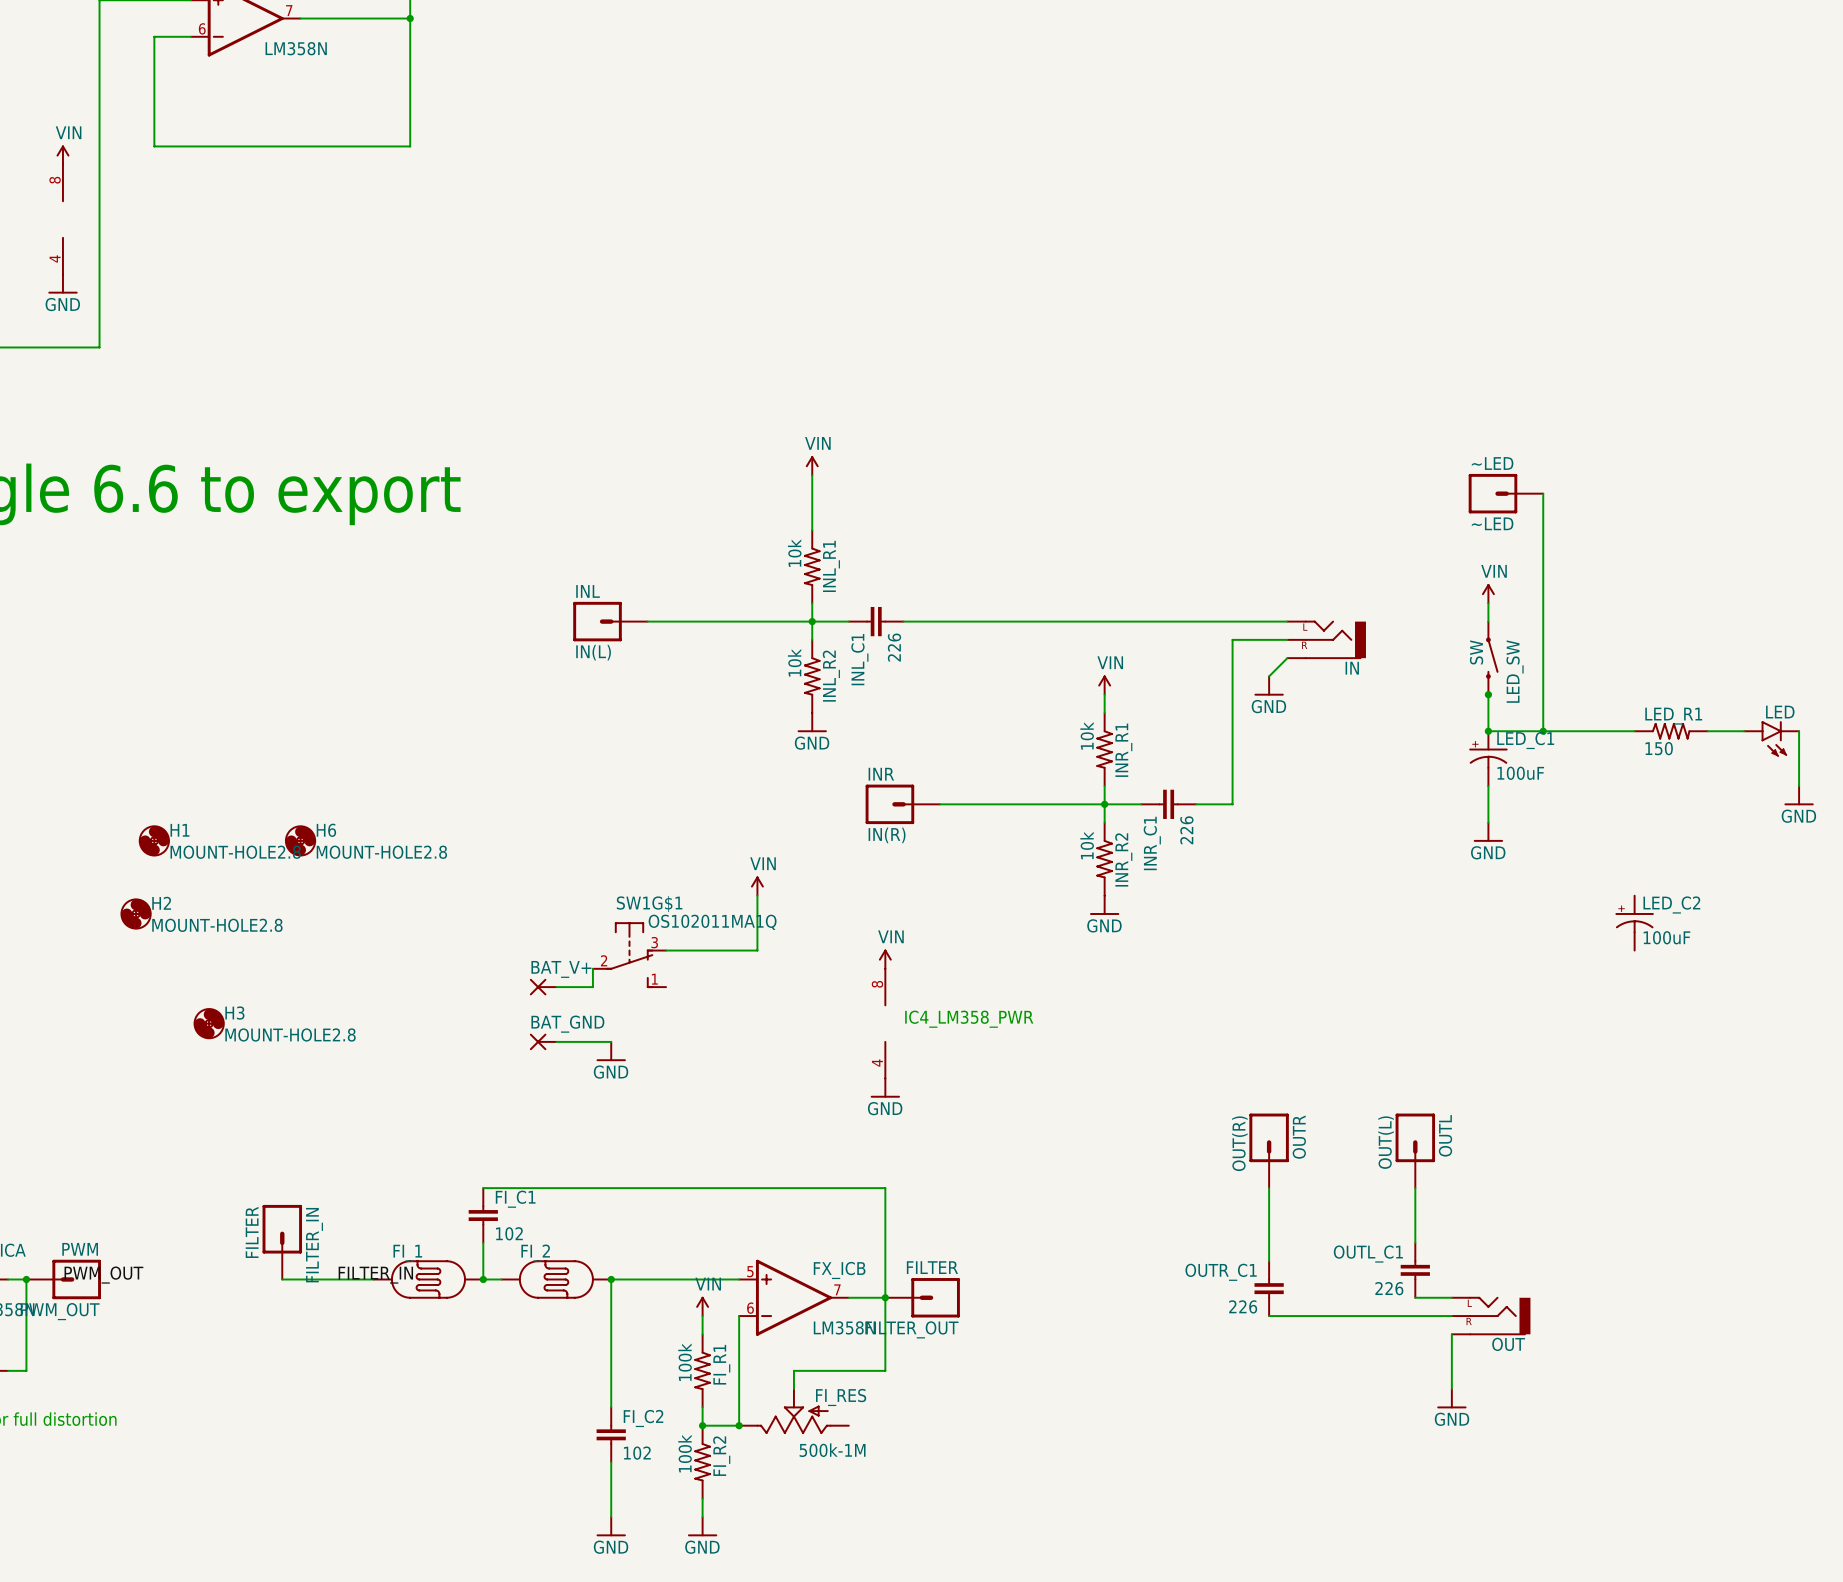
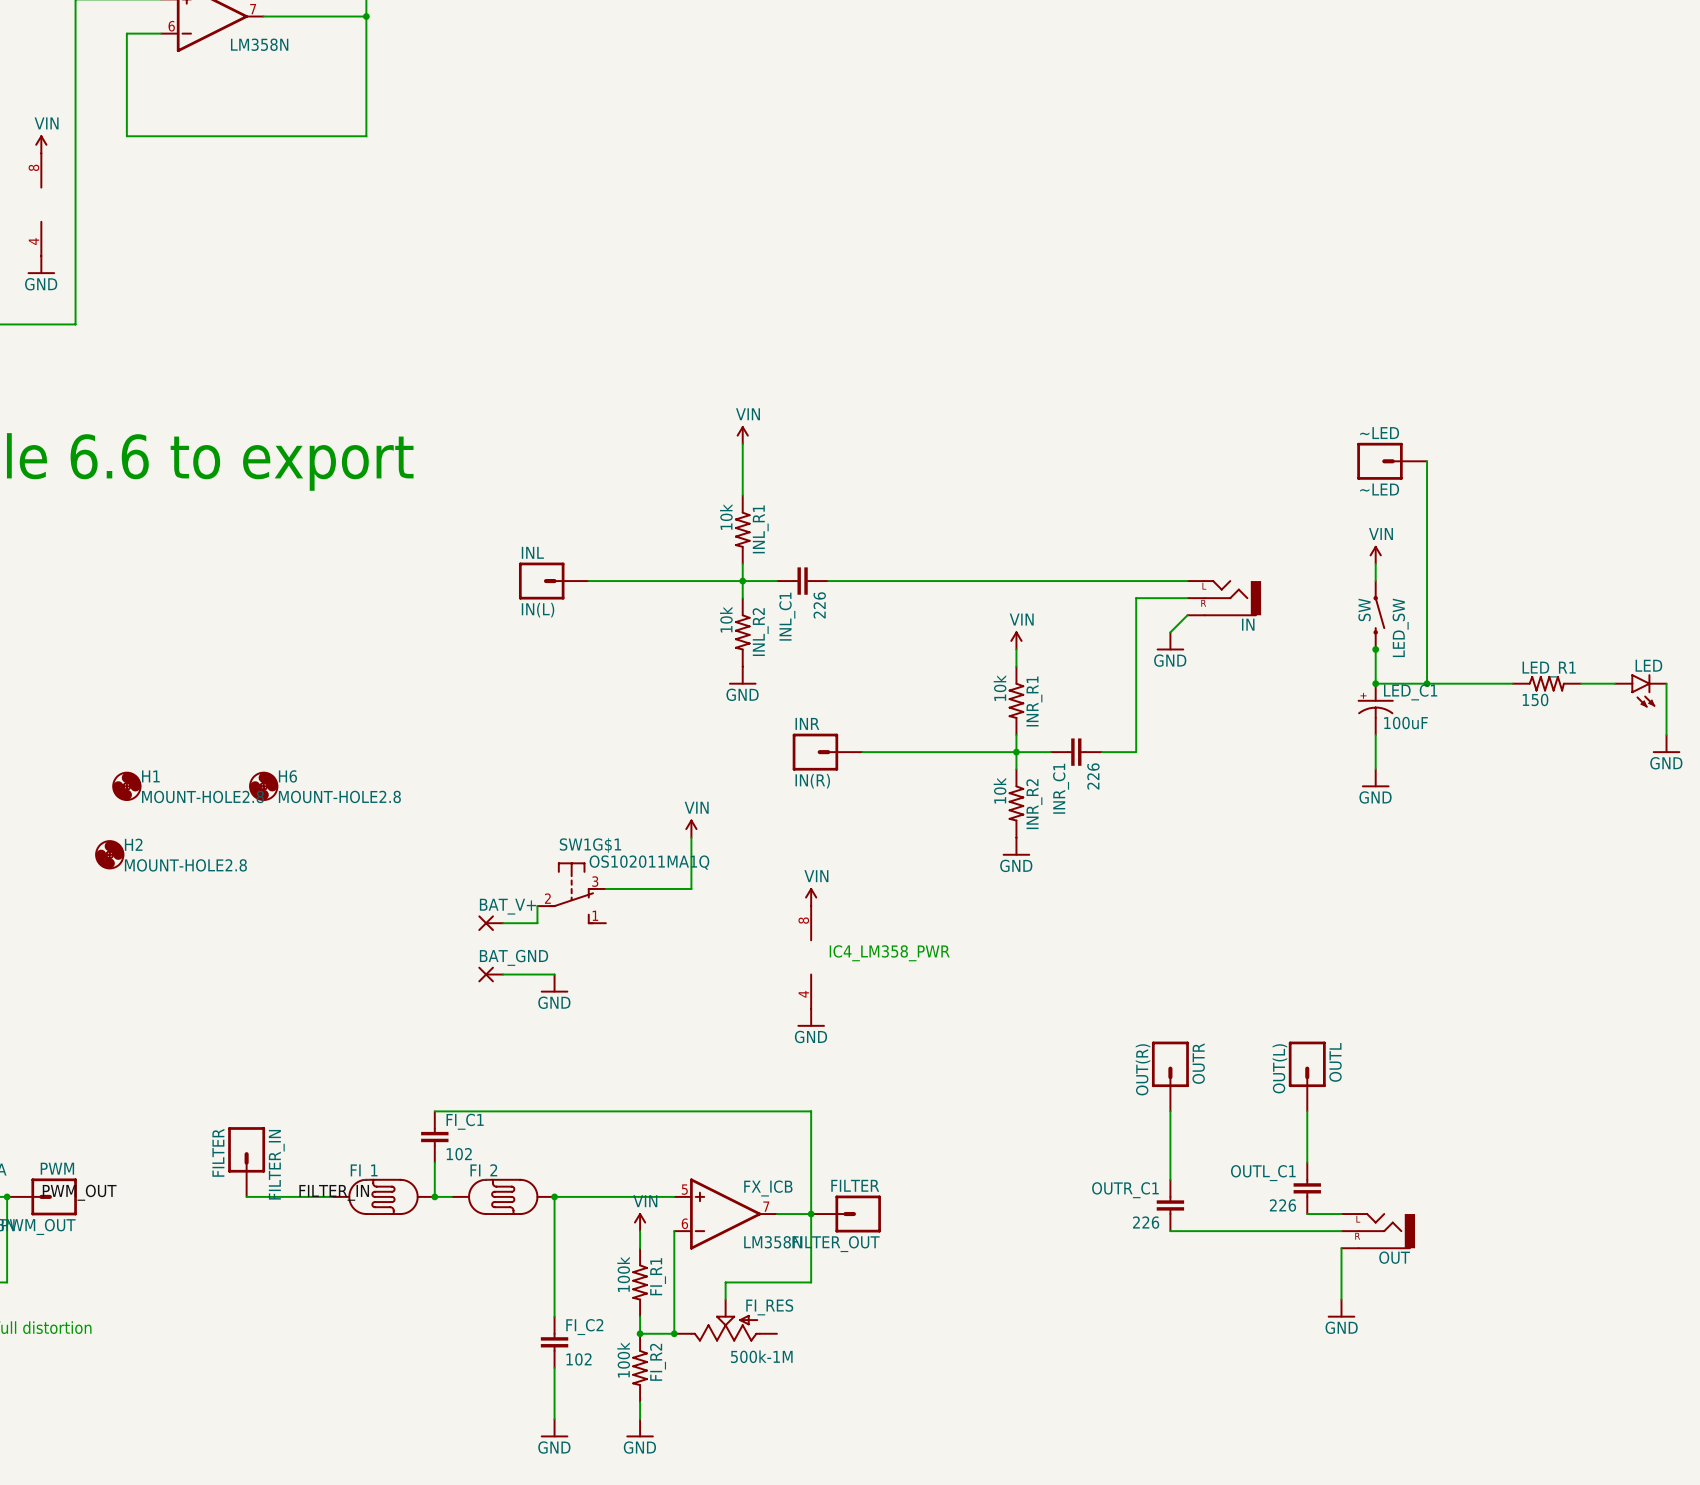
LED_C2: 100uF (1634, 923) -> none
H3: MOUNT-HOLE2.8 (209, 1023) -> none

